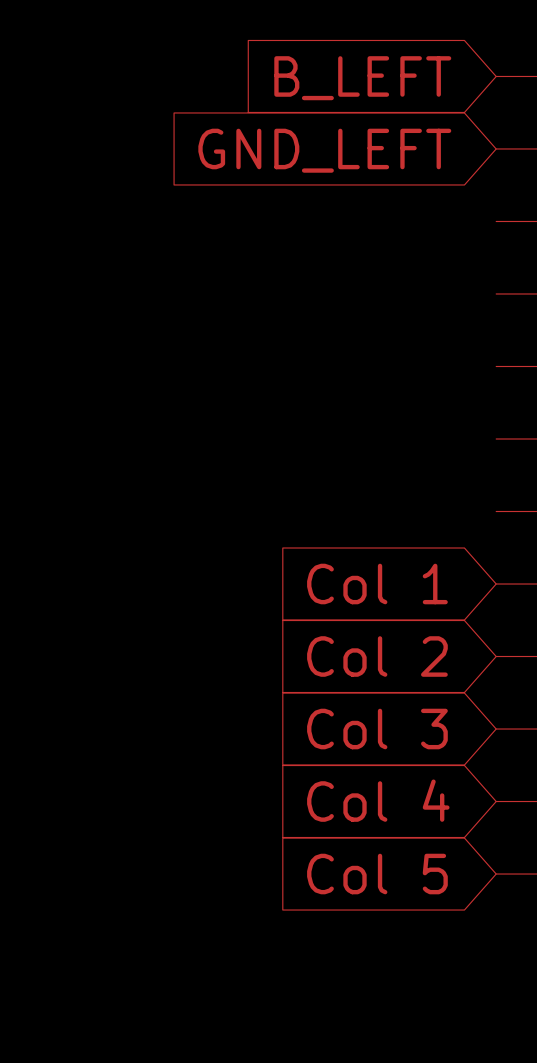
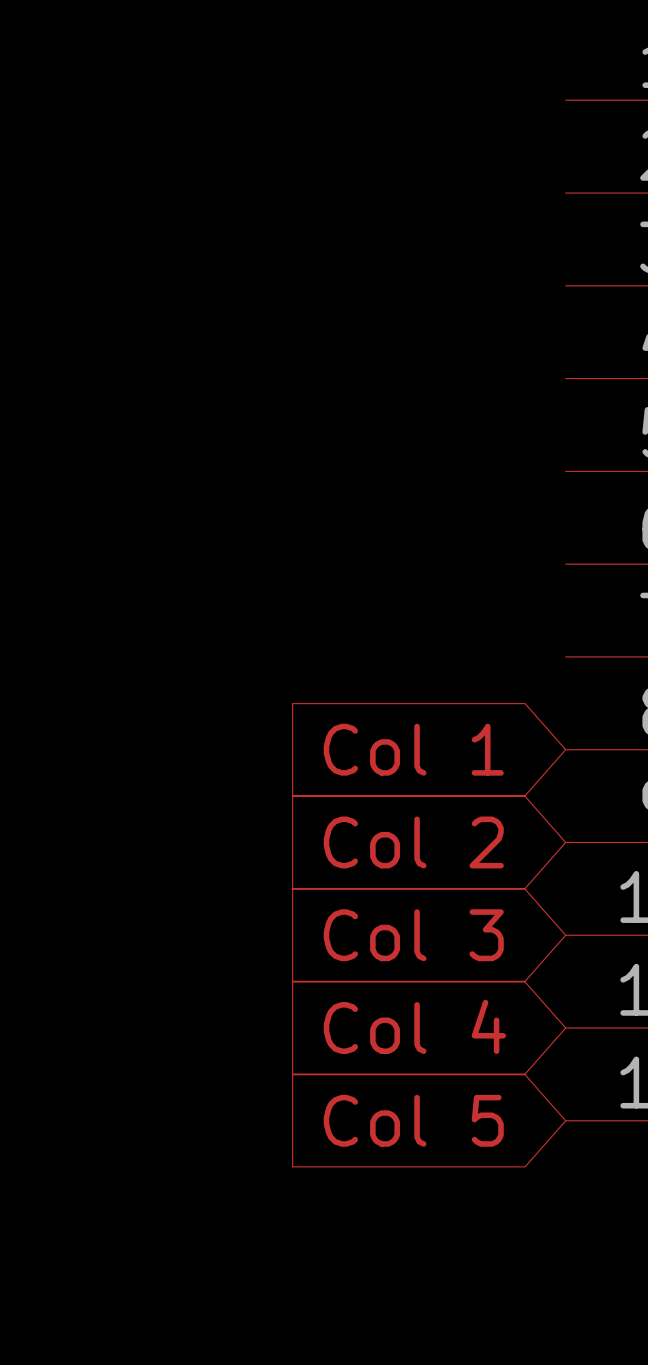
global label: B_LEFT (362, 78) -> none
global label: GND_LEFT (324, 150) -> none

